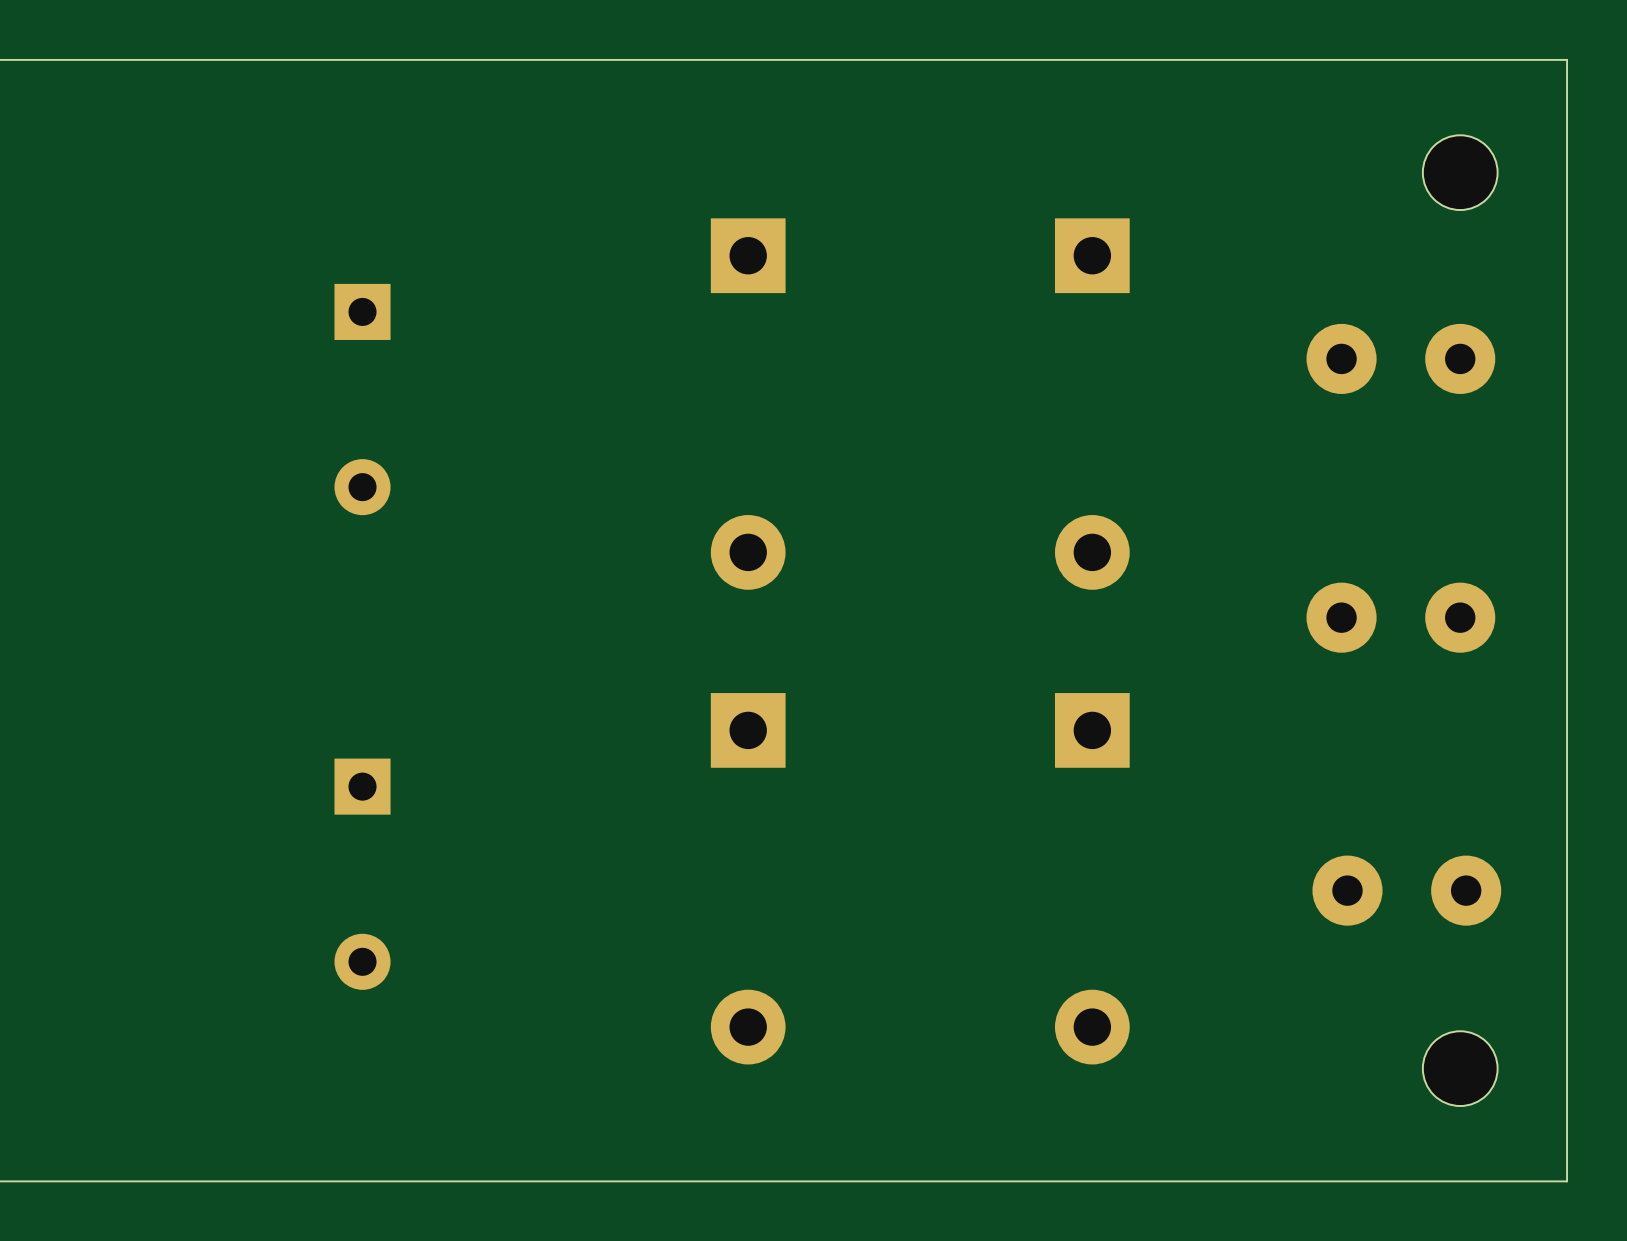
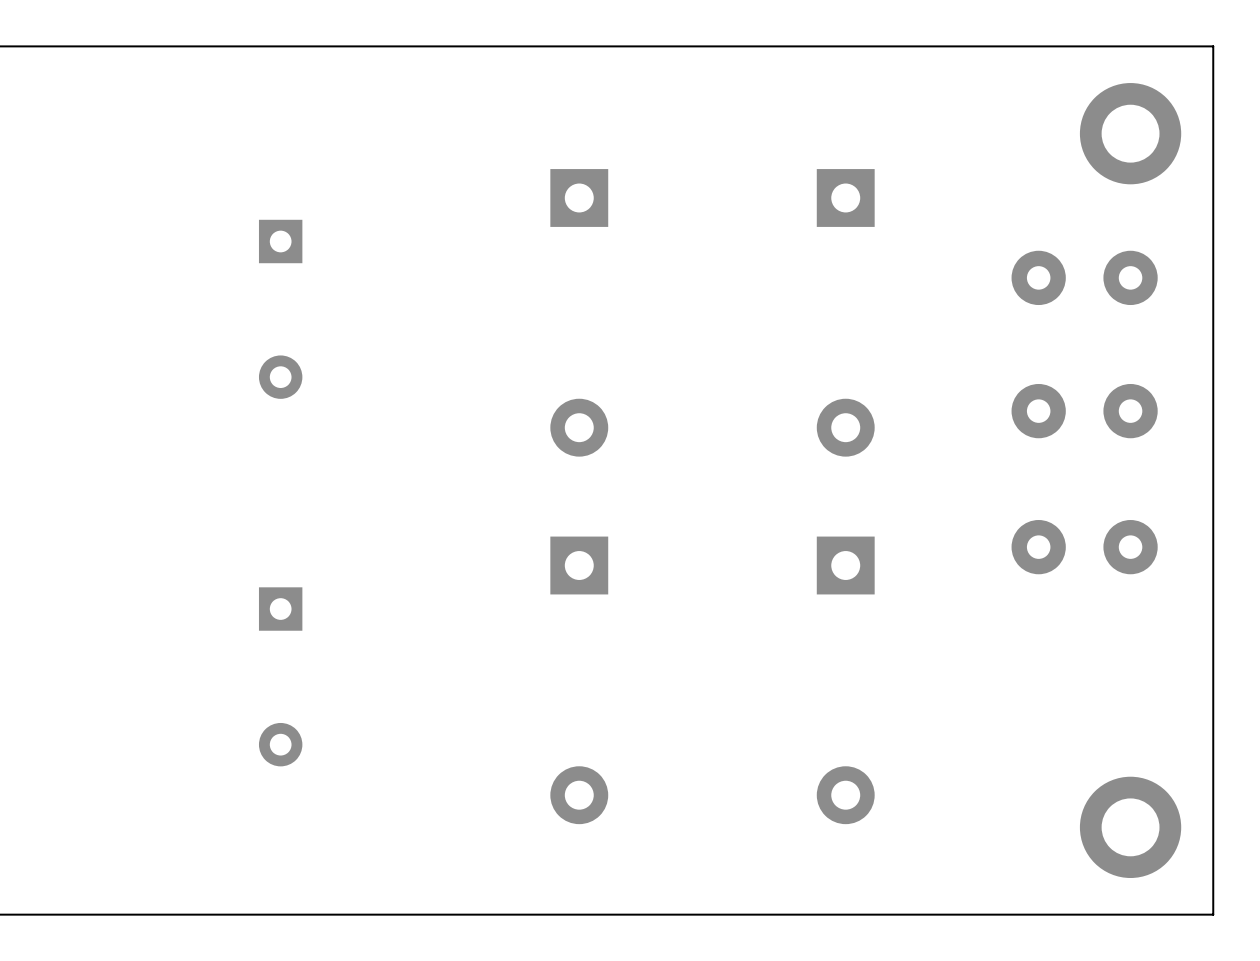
part footprint: [1422, 135, 1498, 211] -> [1079, 83, 1182, 185]
part: none -> (1084, 411)
part: (1400, 617) -> none
part: none -> (1084, 547)
part: (1406, 890) -> none
part footprint: [1422, 1031, 1498, 1107] -> [1079, 776, 1182, 879]

